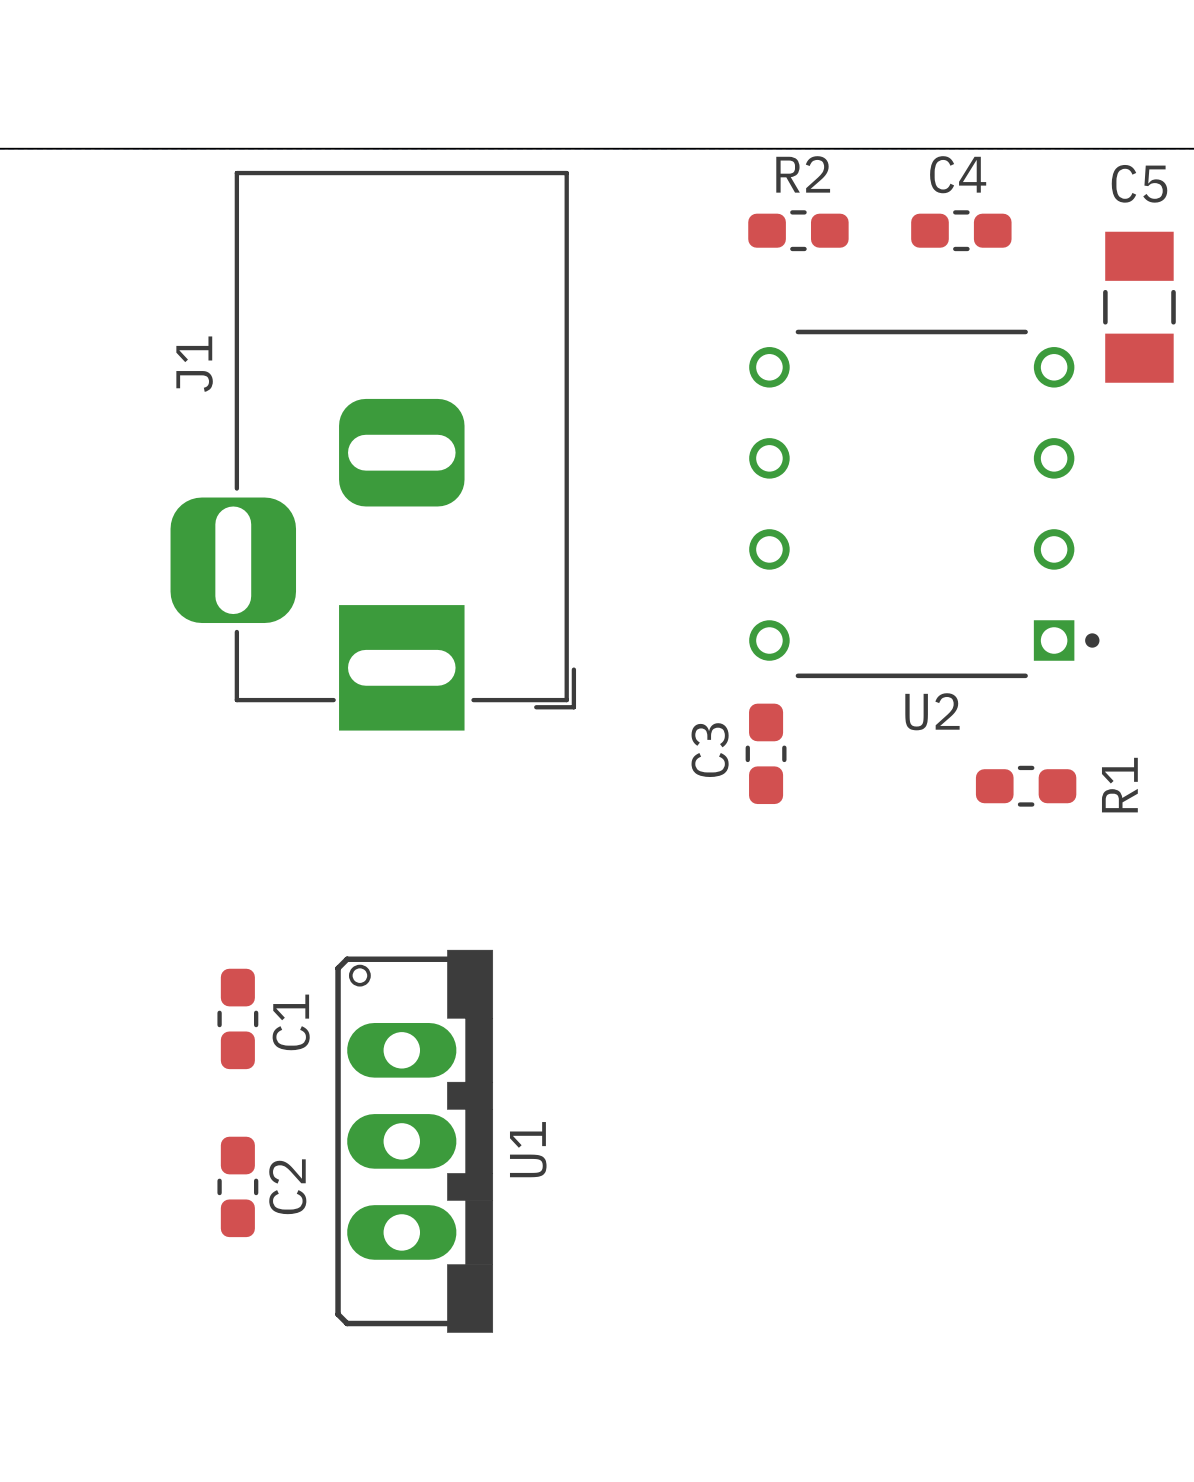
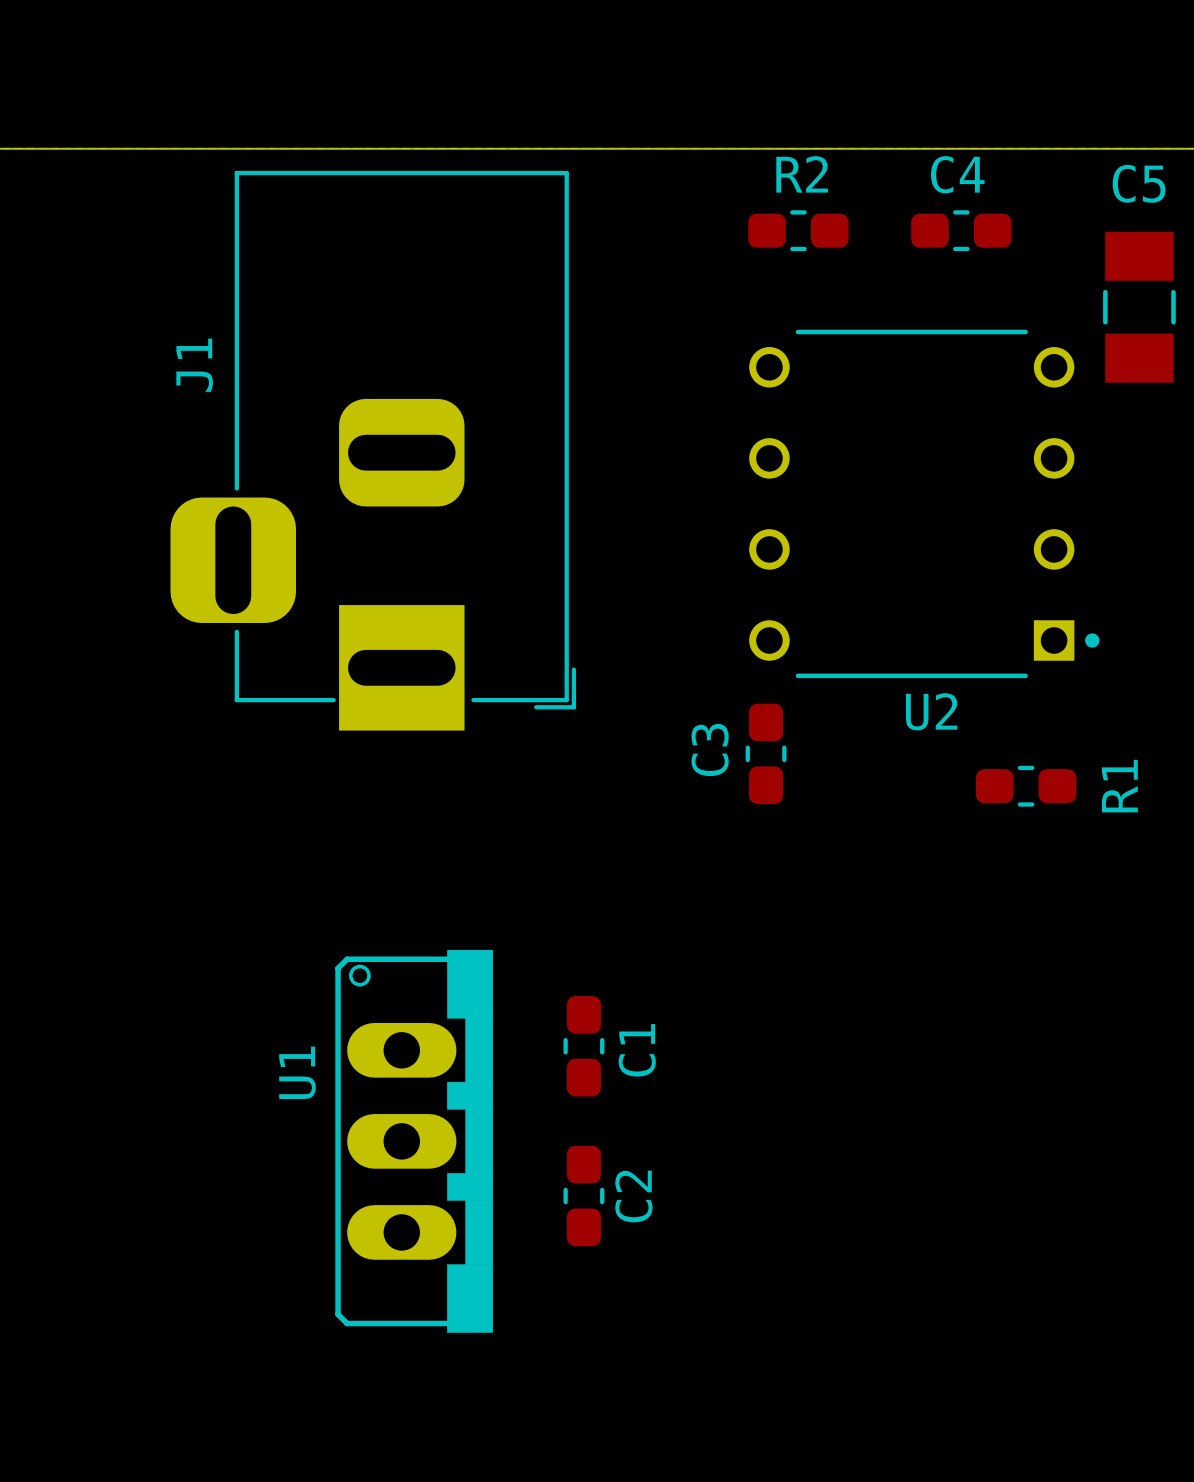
C1 position: (237, 1018) -> (583, 1046)
U1 name position: U1 (528, 1149) -> U1 (297, 1072)
C2 position: (237, 1186) -> (583, 1196)

